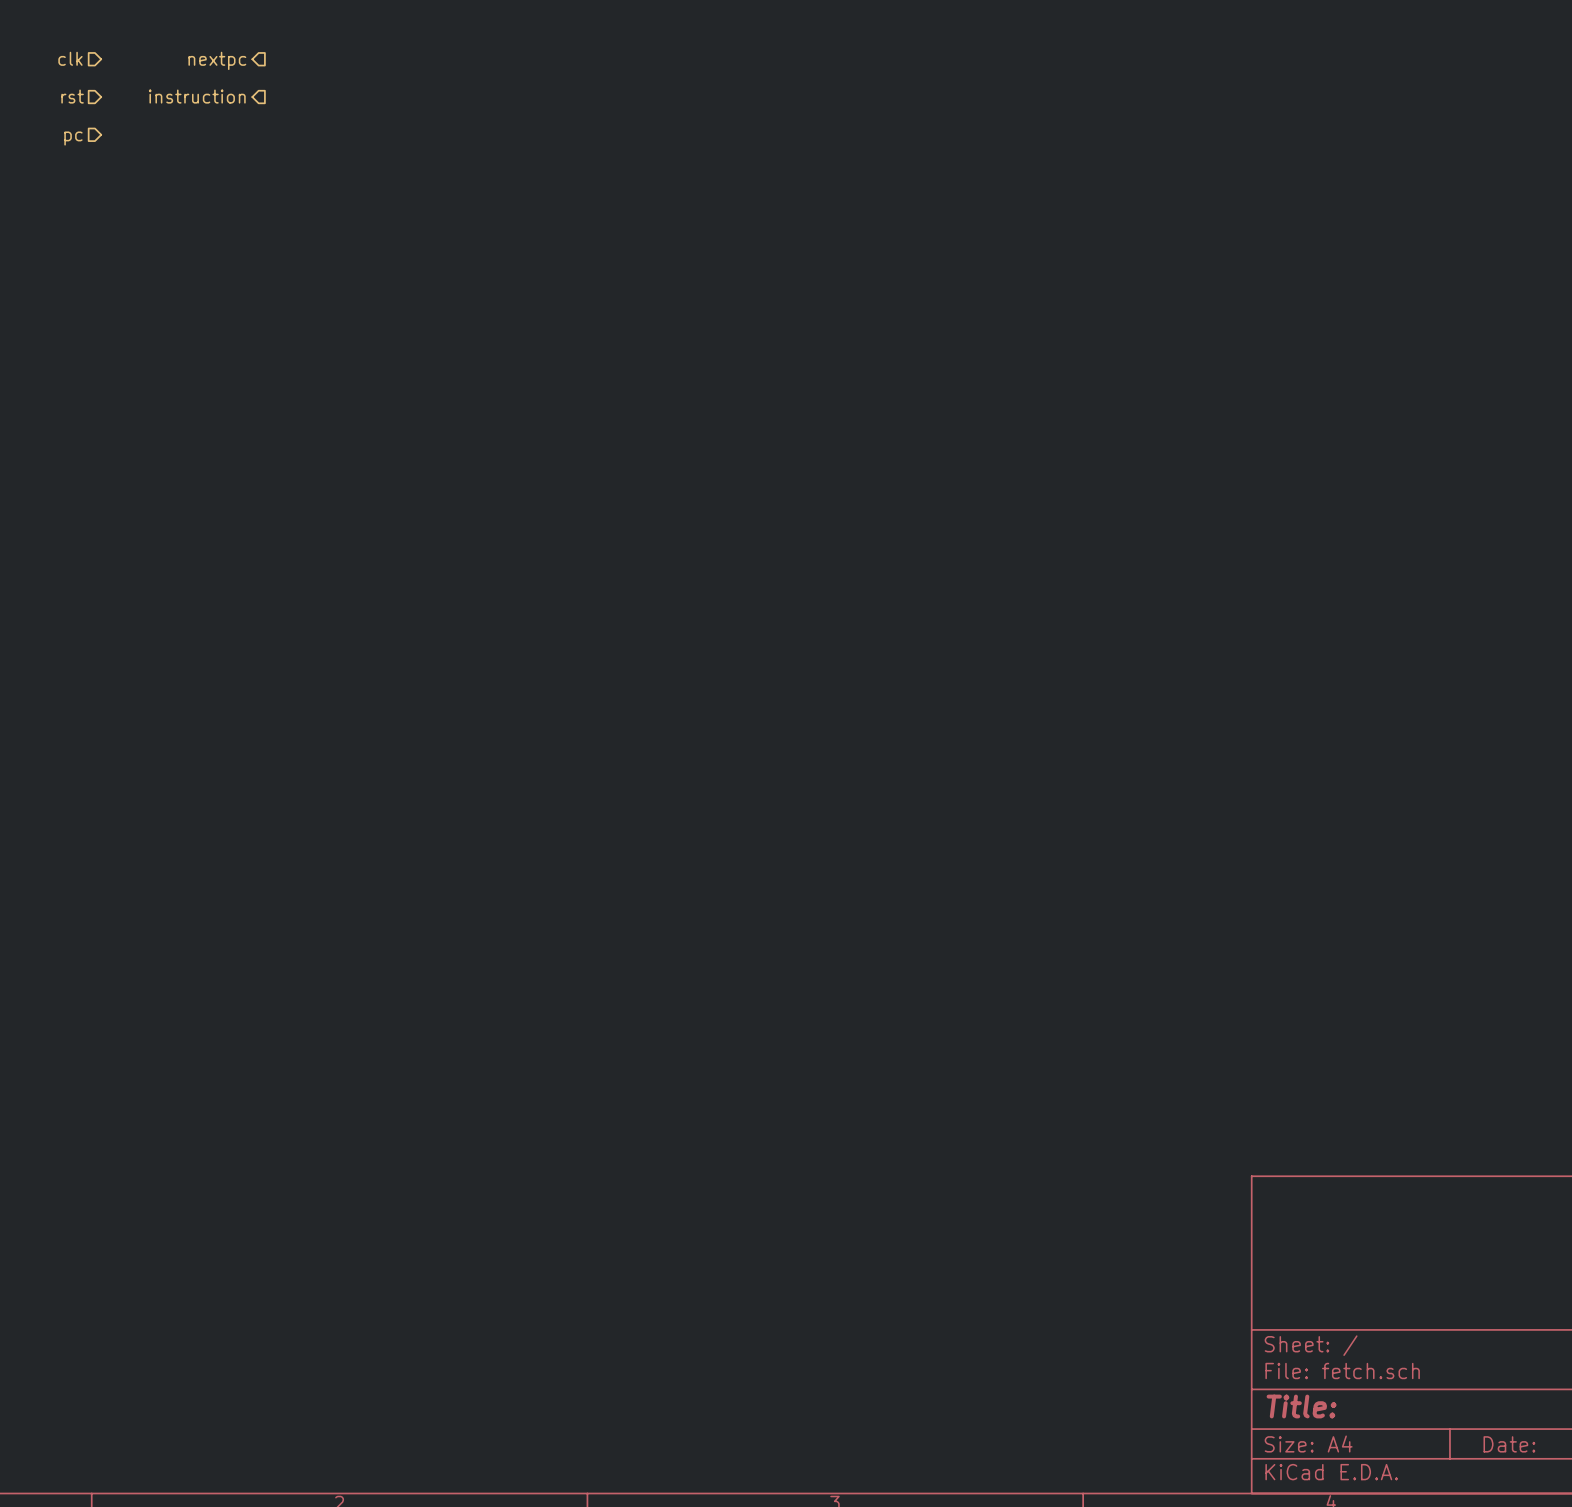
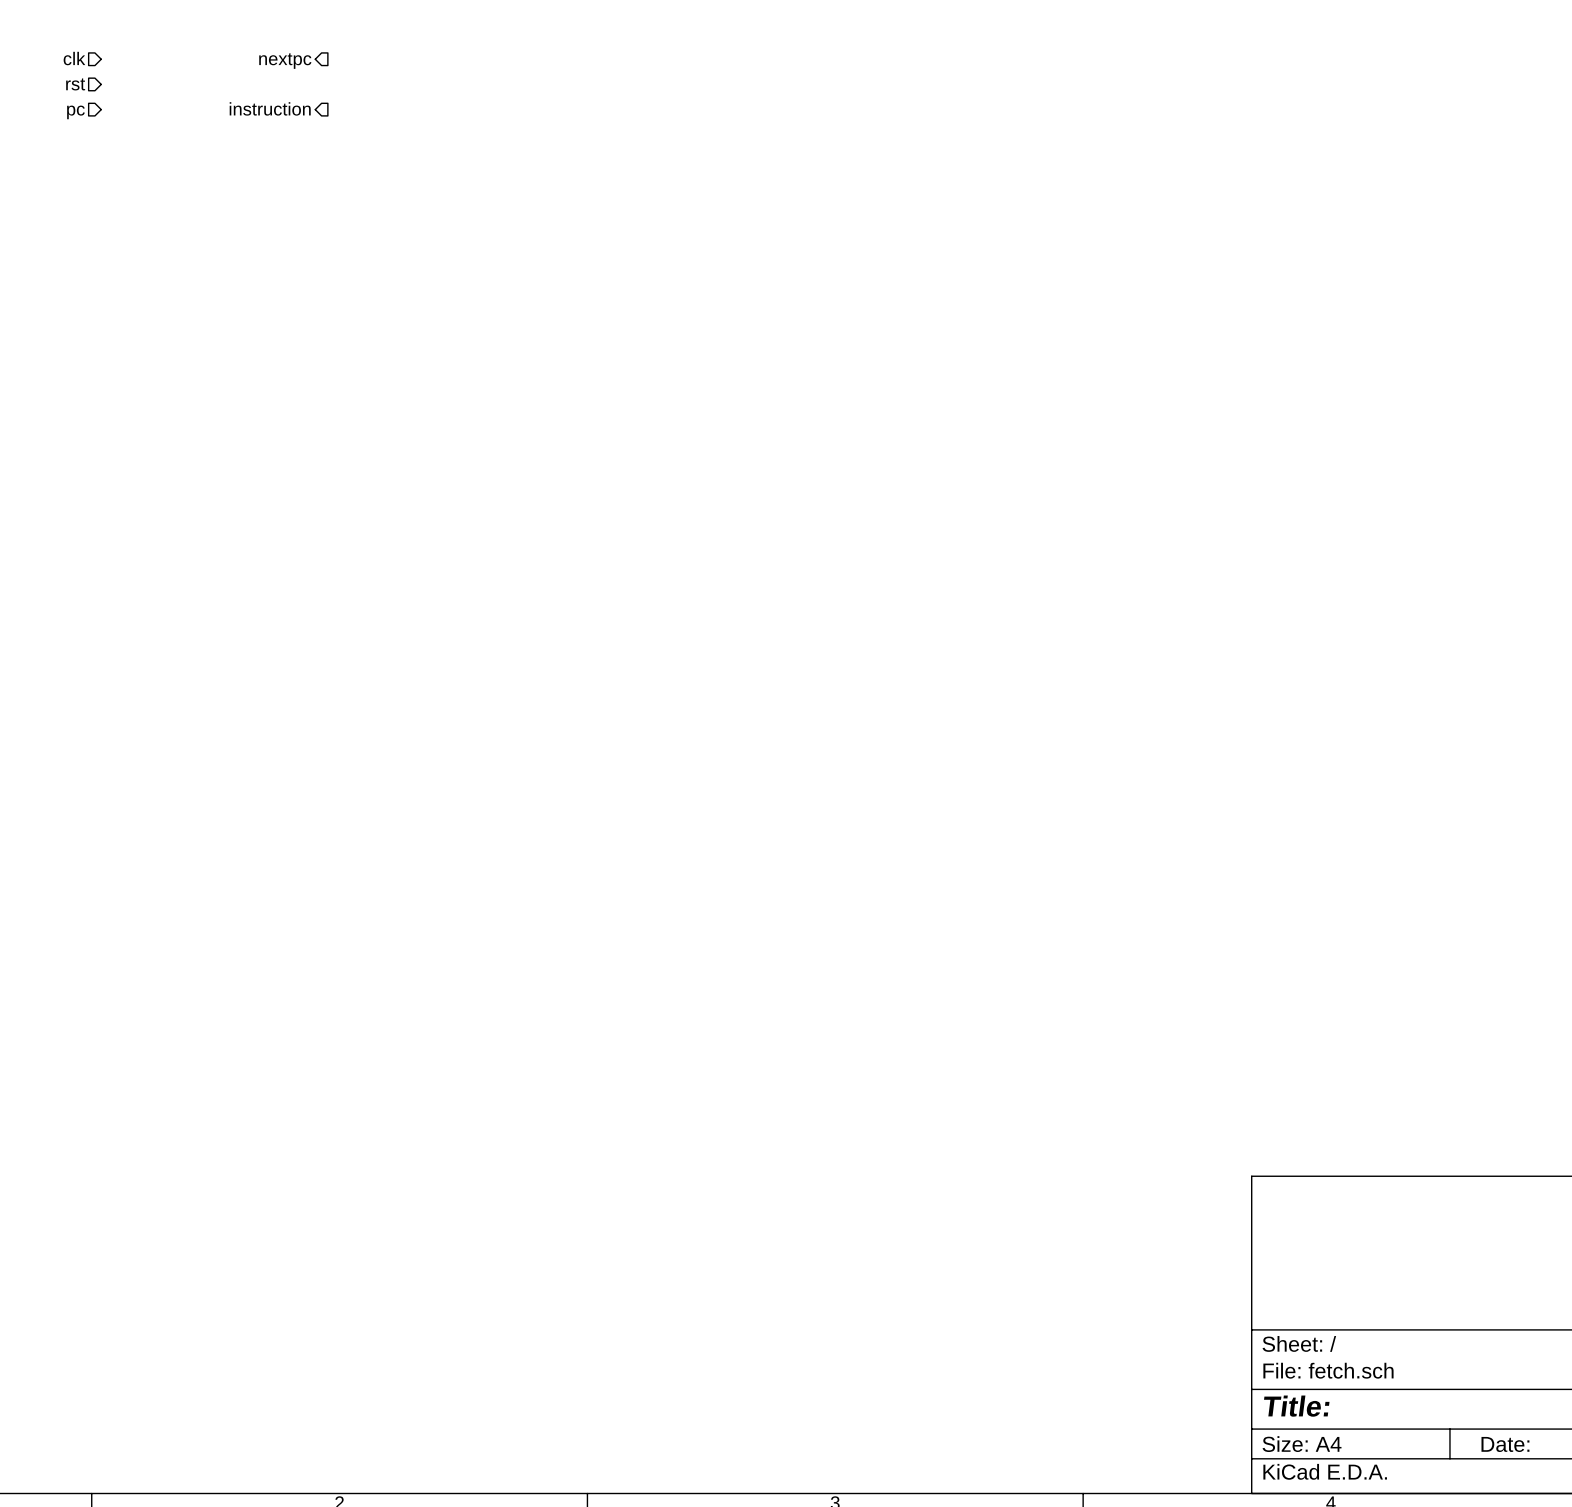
hierarchical label position: nextpc (217, 60) -> nextpc (285, 61)
hierarchical label position: rst (72, 96) -> rst (75, 84)
hierarchical label position: instruction (197, 96) -> instruction (270, 108)
hierarchical label position: pc (73, 138) -> pc (75, 112)

